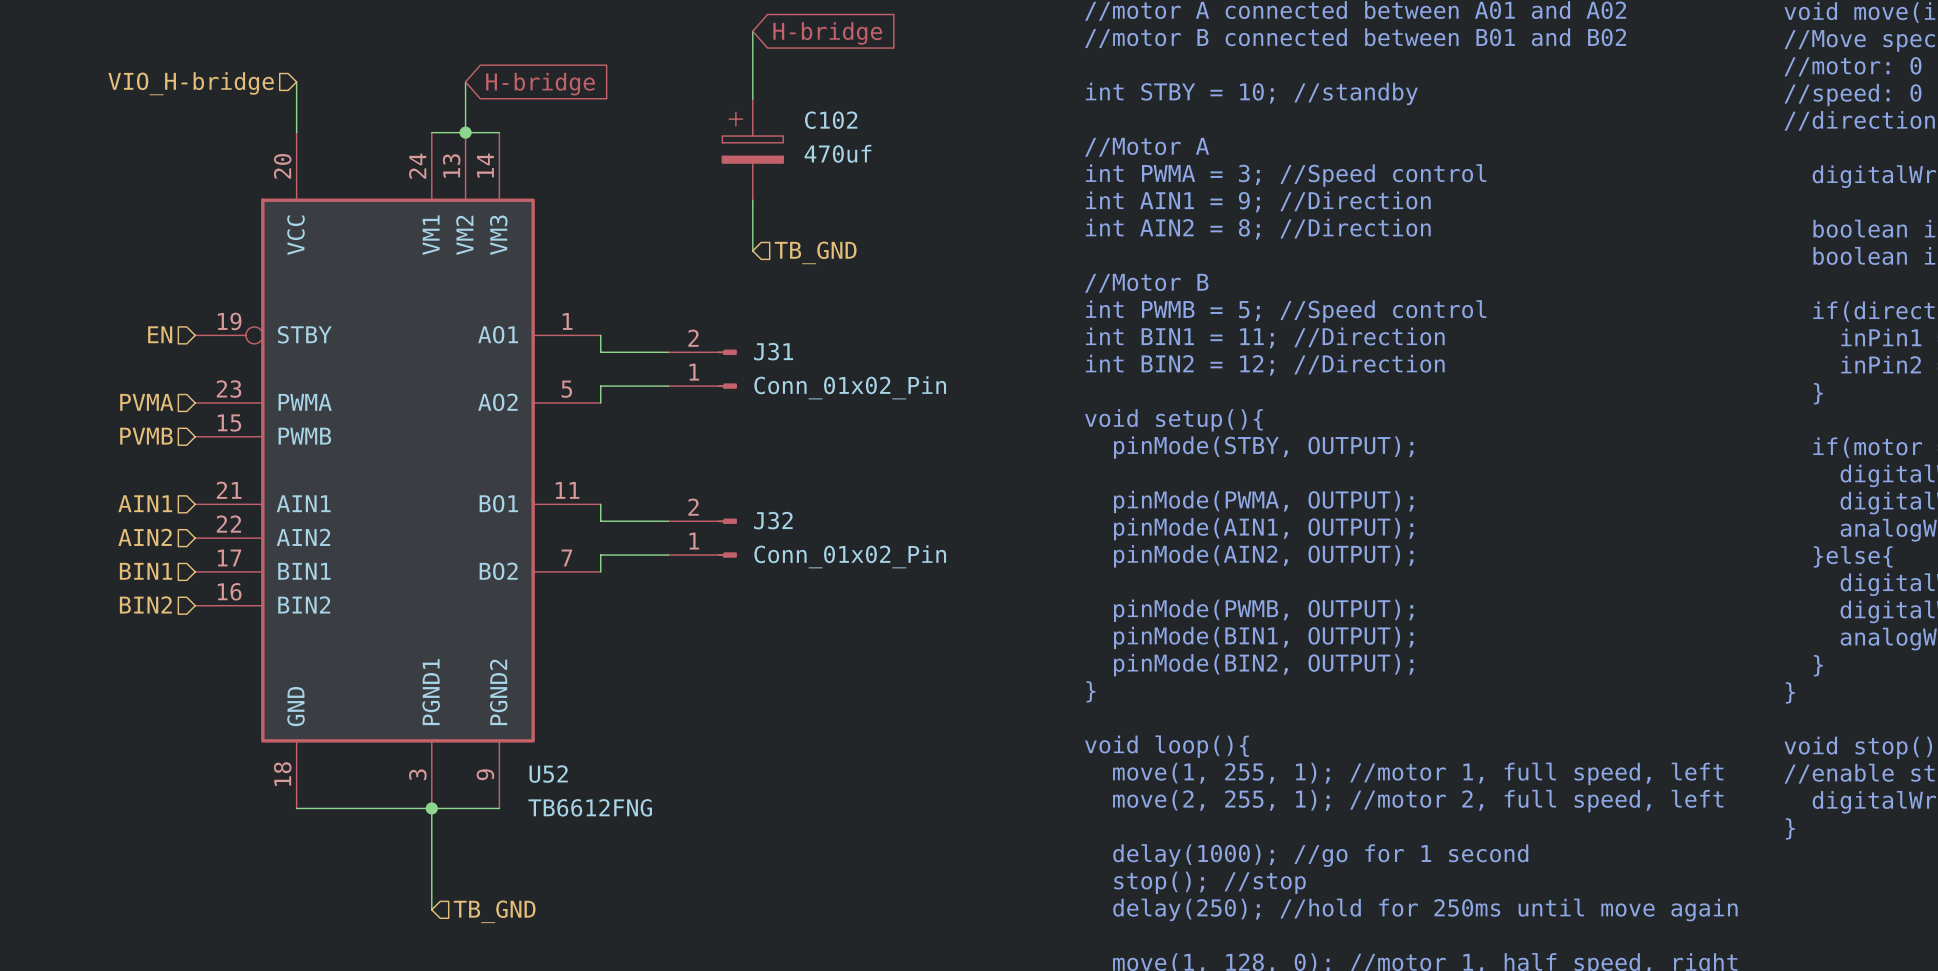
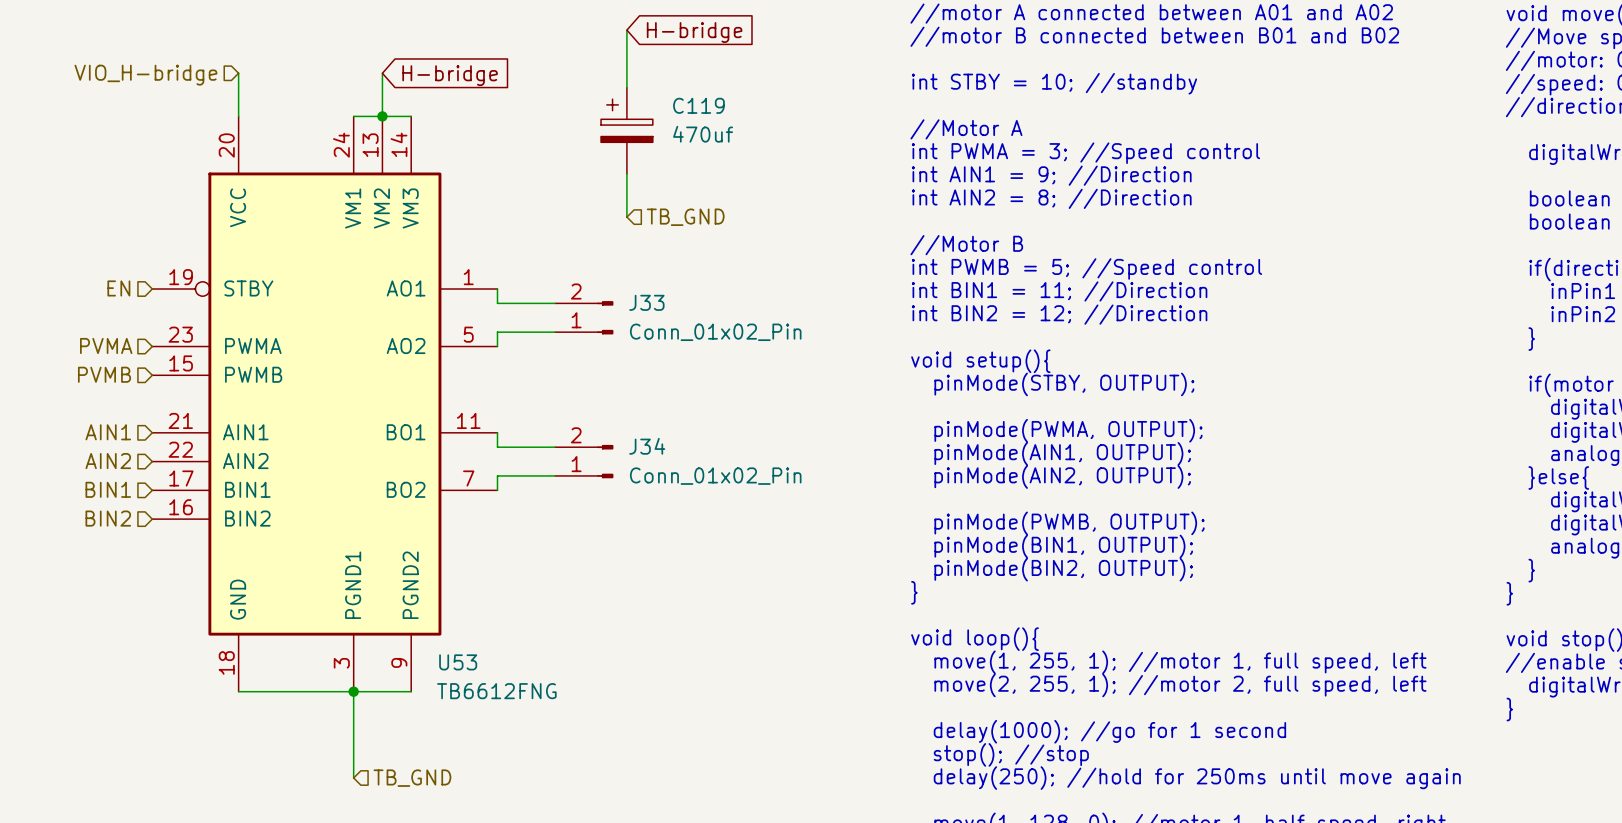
C102 name: C102 (831, 120) -> C119 (698, 105)
J31 name: J31 (773, 351) -> J33 (646, 302)
J32 name: J32 (773, 520) -> J34 (647, 446)
U52 name: U52 (548, 774) -> U53 (458, 662)

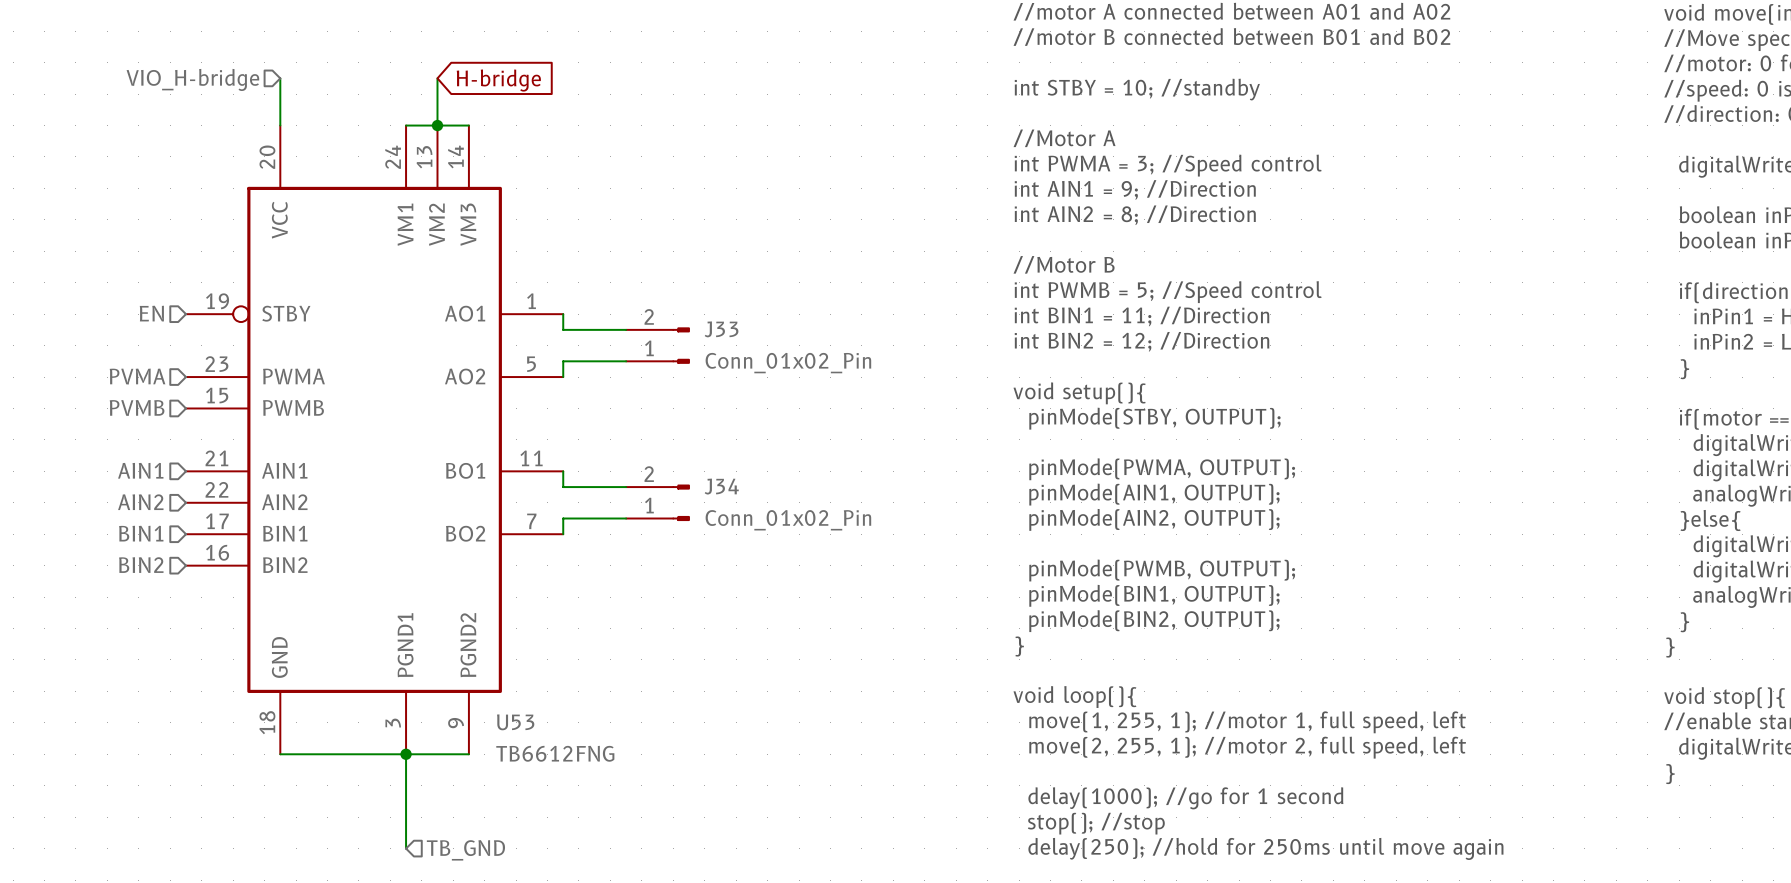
wire: (626, 30) (626, 87) -> none
global label: H-bridge (694, 32) -> none
C119: 470uf (626, 130) -> none
wire: (626, 173) (626, 217) -> none
hierarchical label: TB_GND (685, 217) -> none

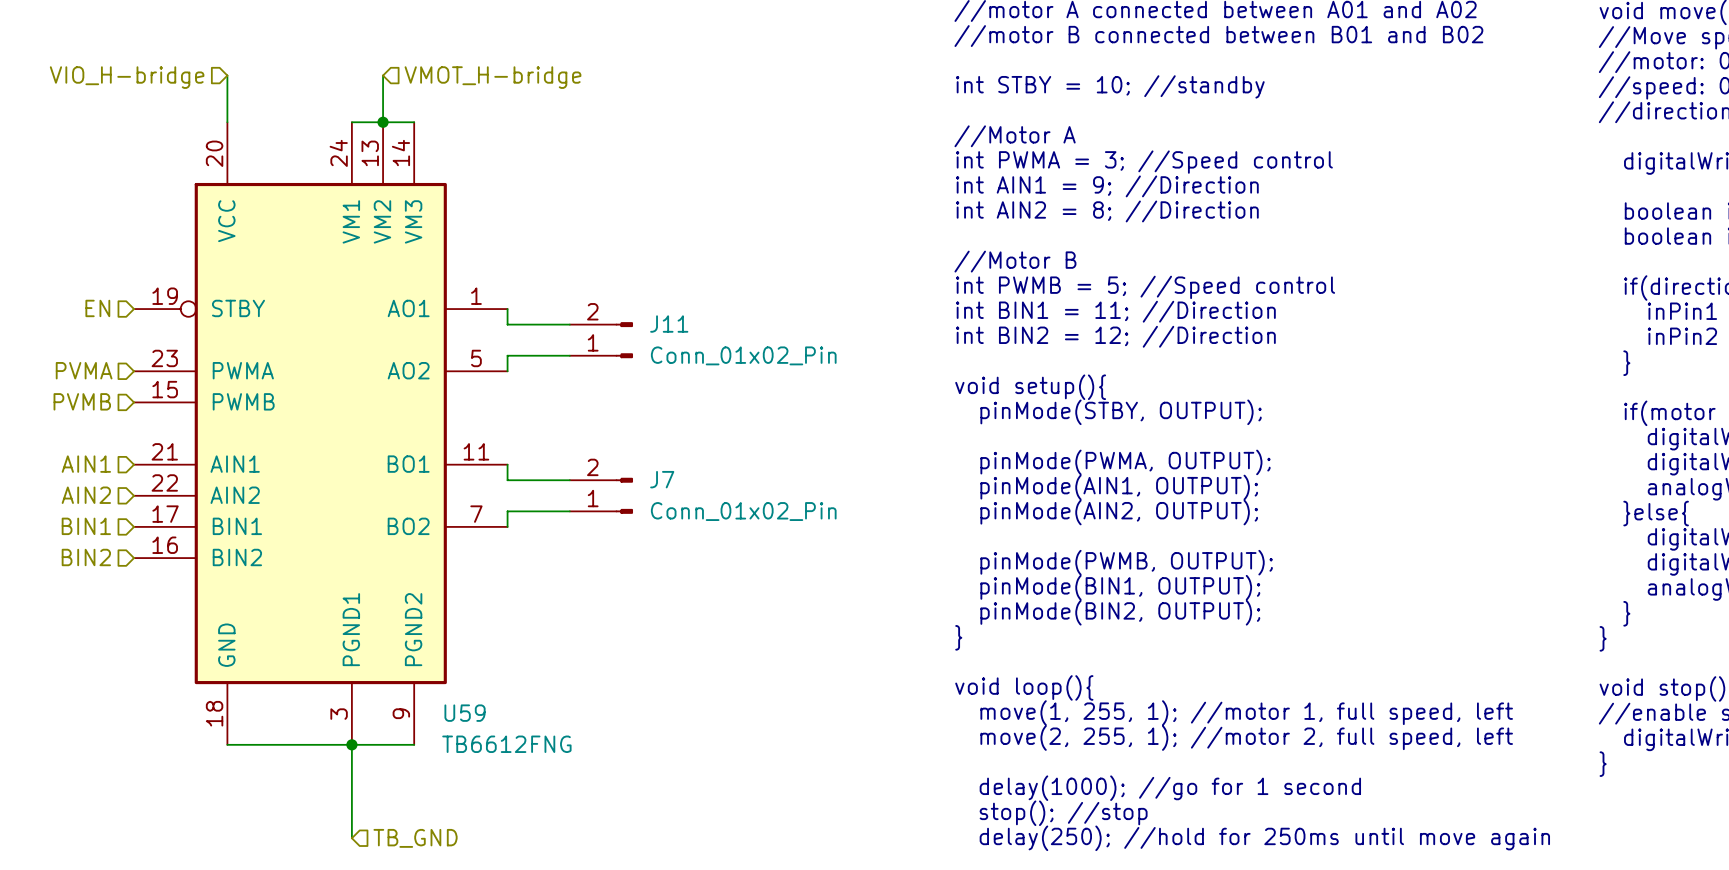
hierarchical label: none -> VMOT_H-bridge (492, 77)
global label: H-bridge (498, 80) -> none
J33 name: J33 (721, 329) -> J11 (669, 324)
J34 name: J34 (721, 486) -> J7 (662, 479)
U53 name: U53 (515, 722) -> U59 (465, 713)

